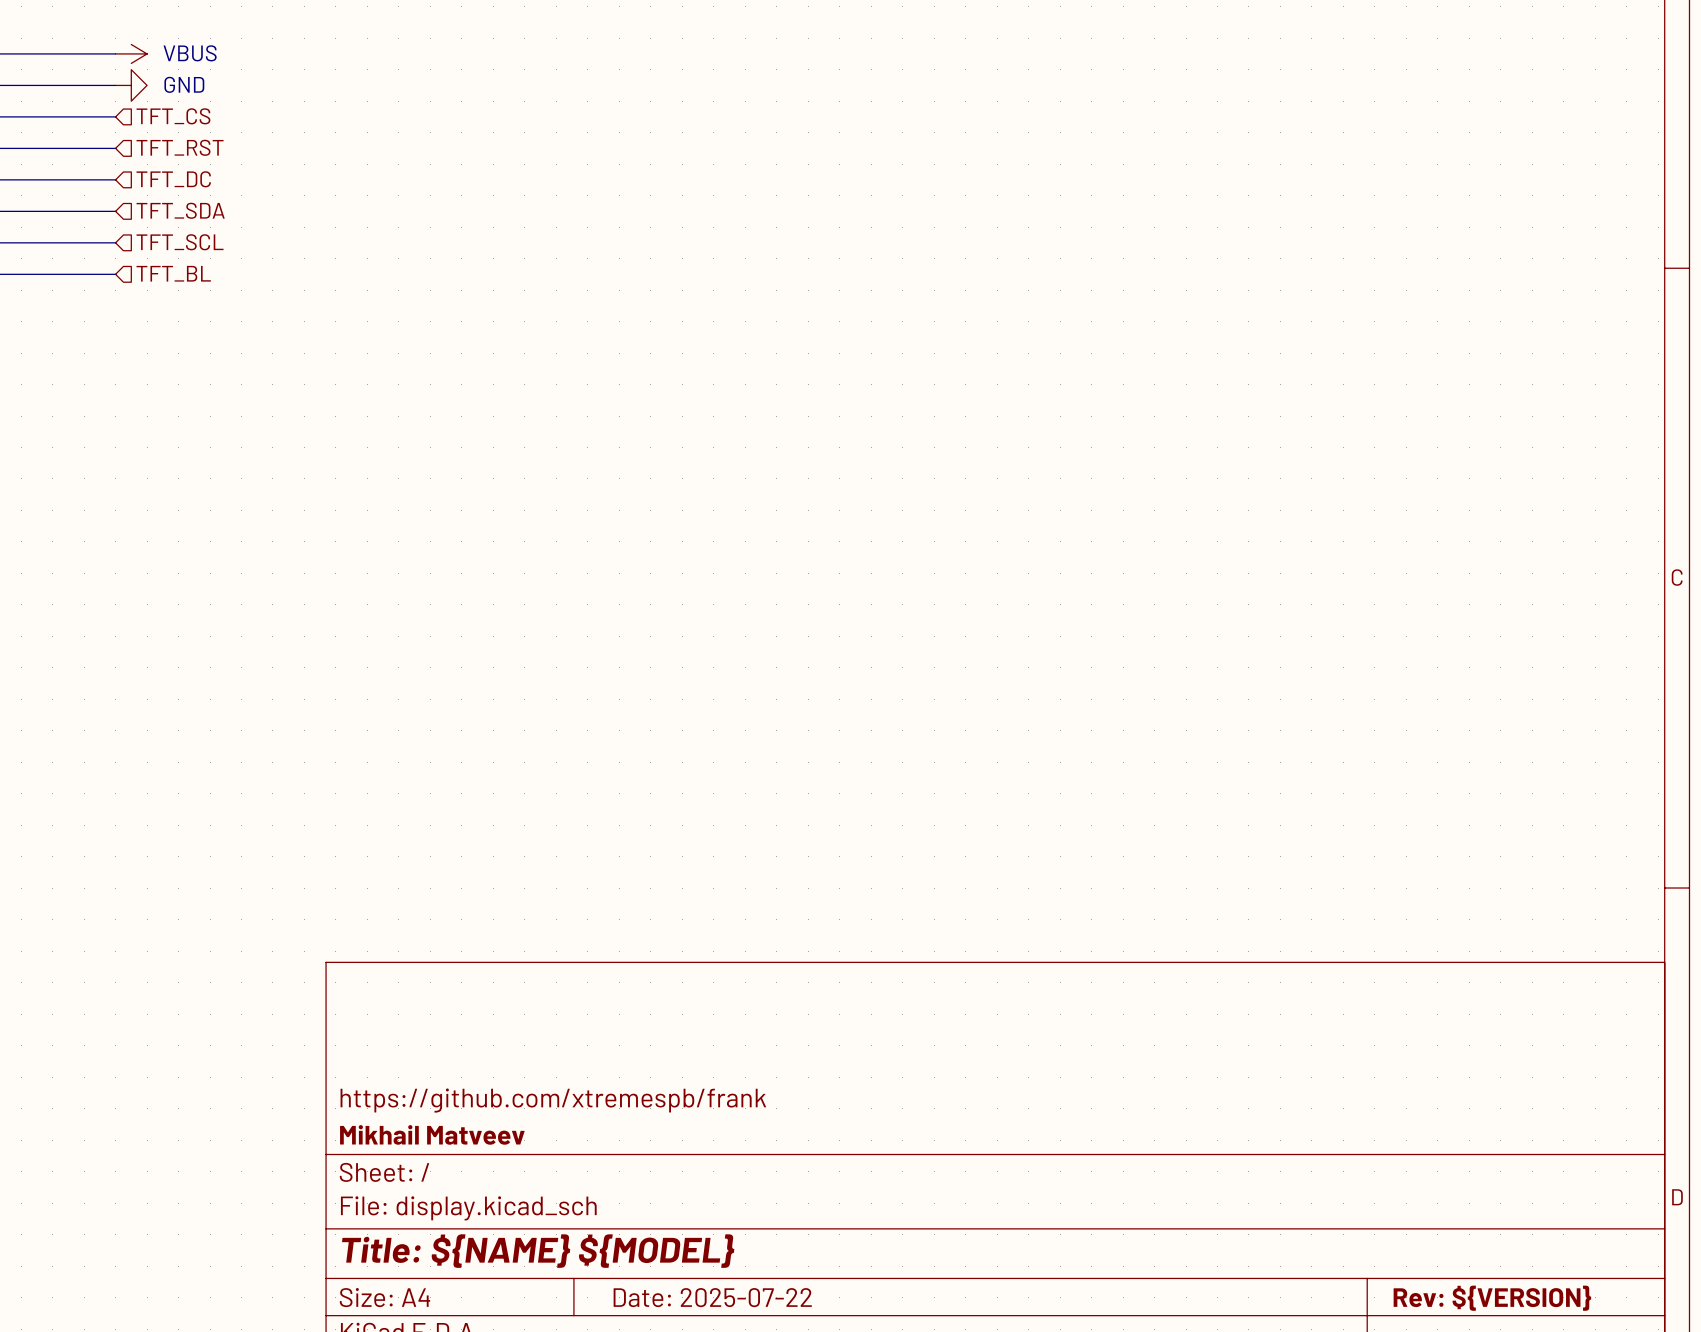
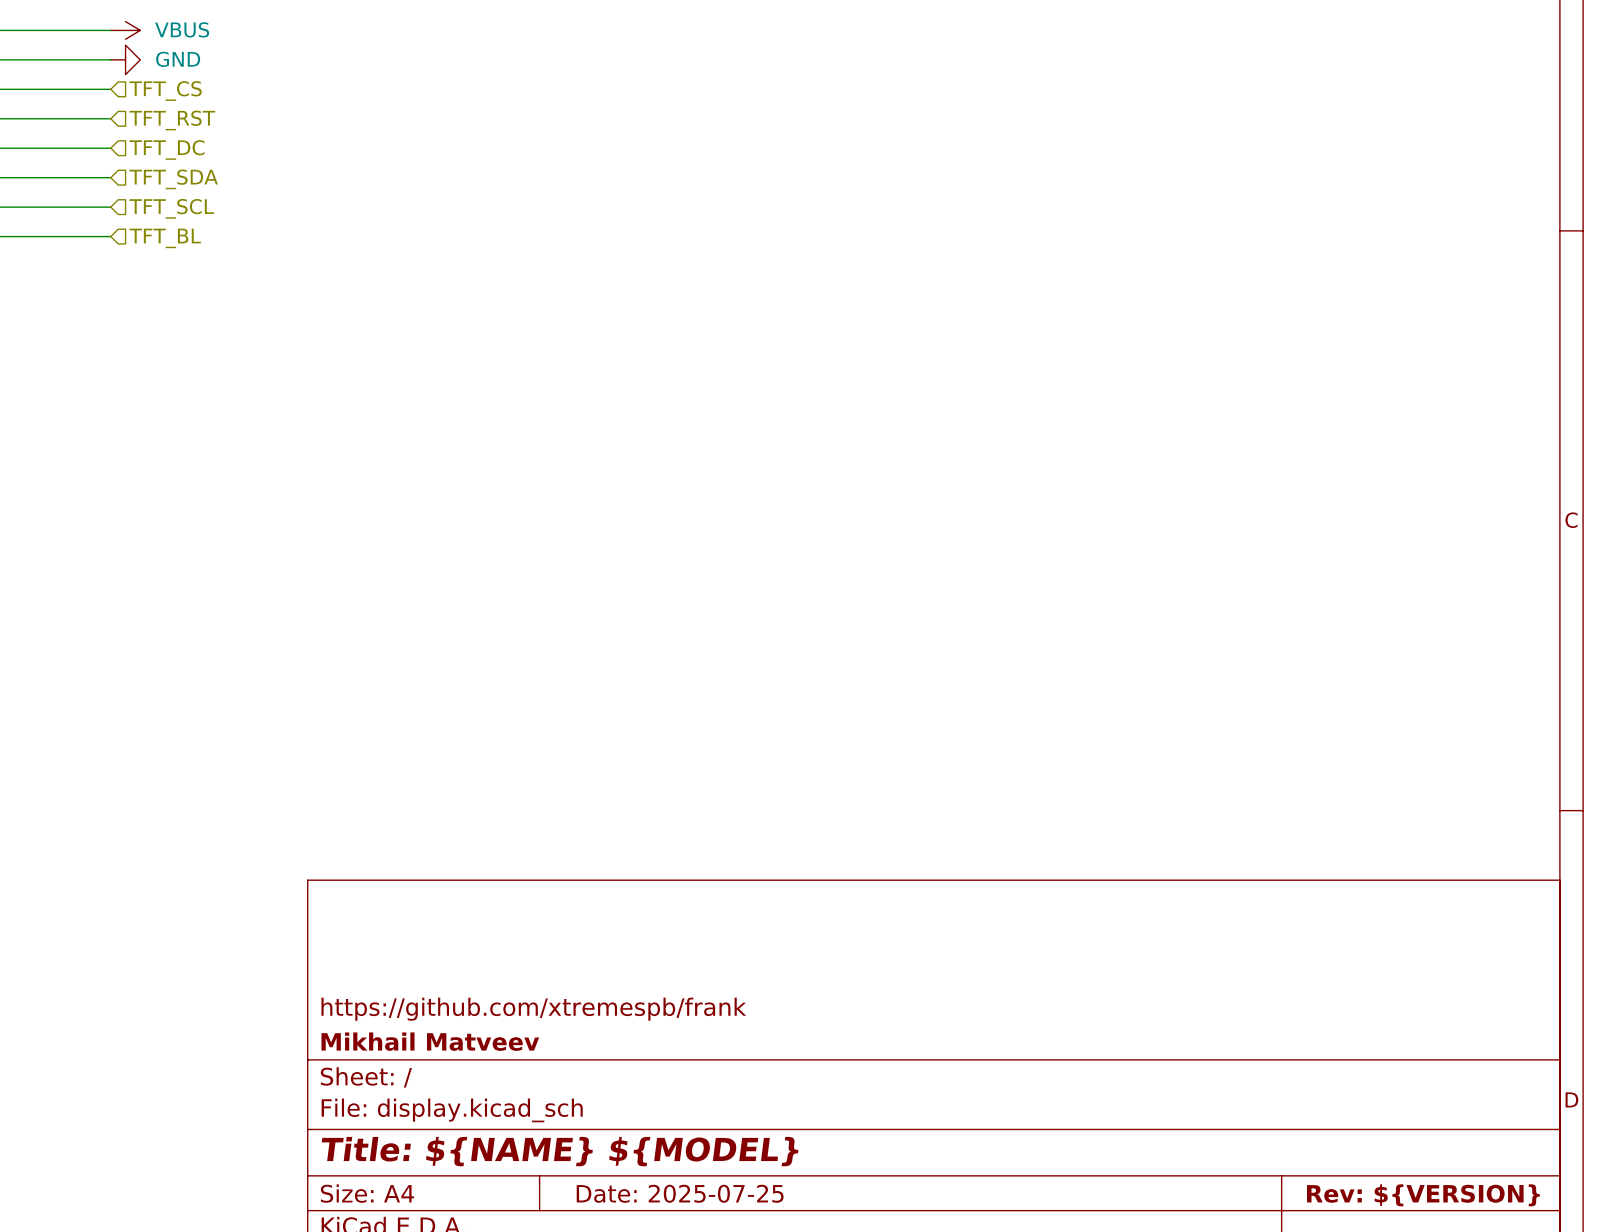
title block: Date: 2025-07-22 (712, 1297) -> Date: 2025-07-25 (680, 1193)

